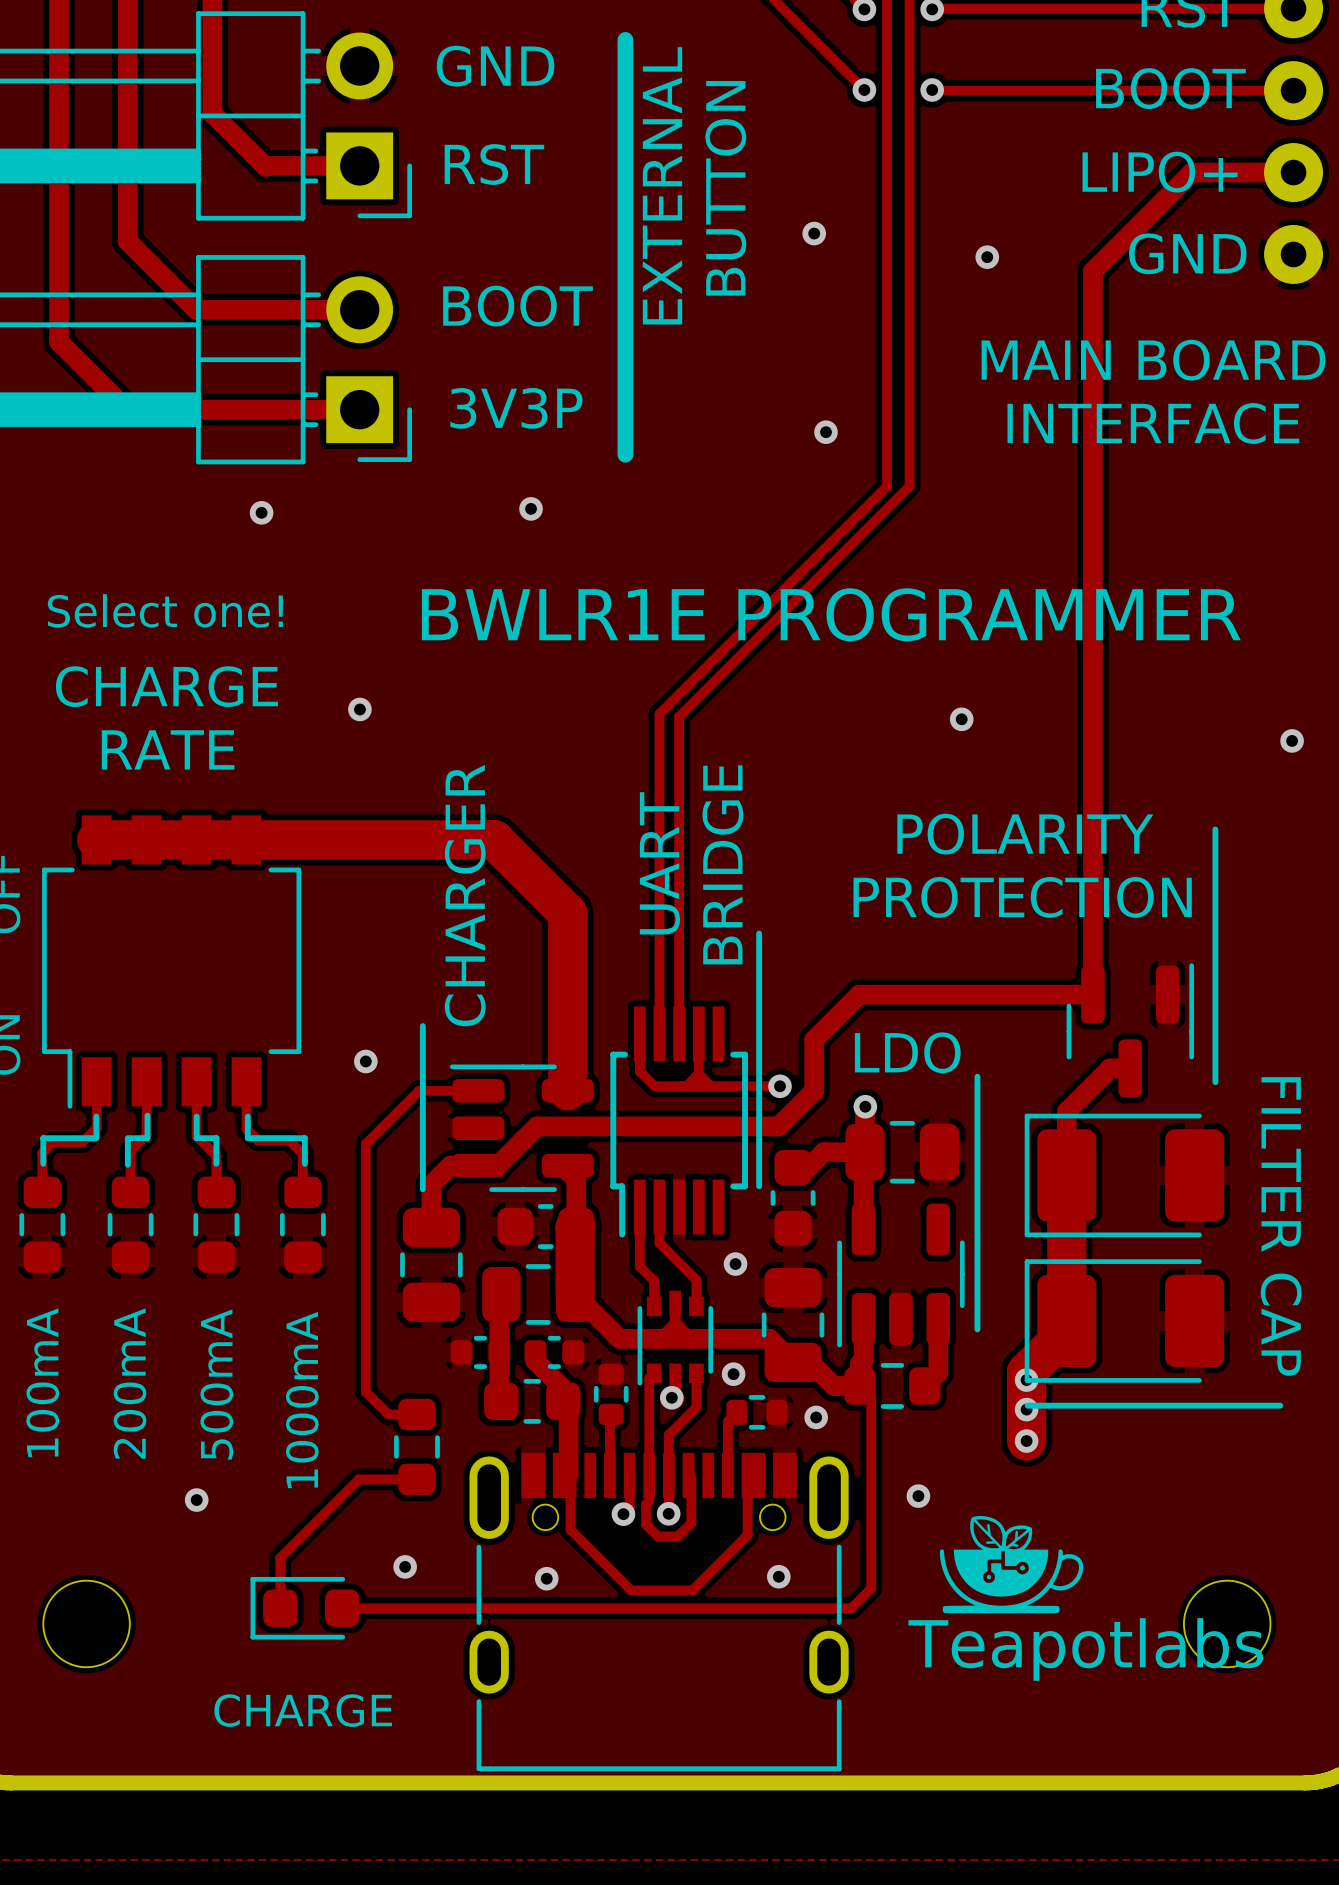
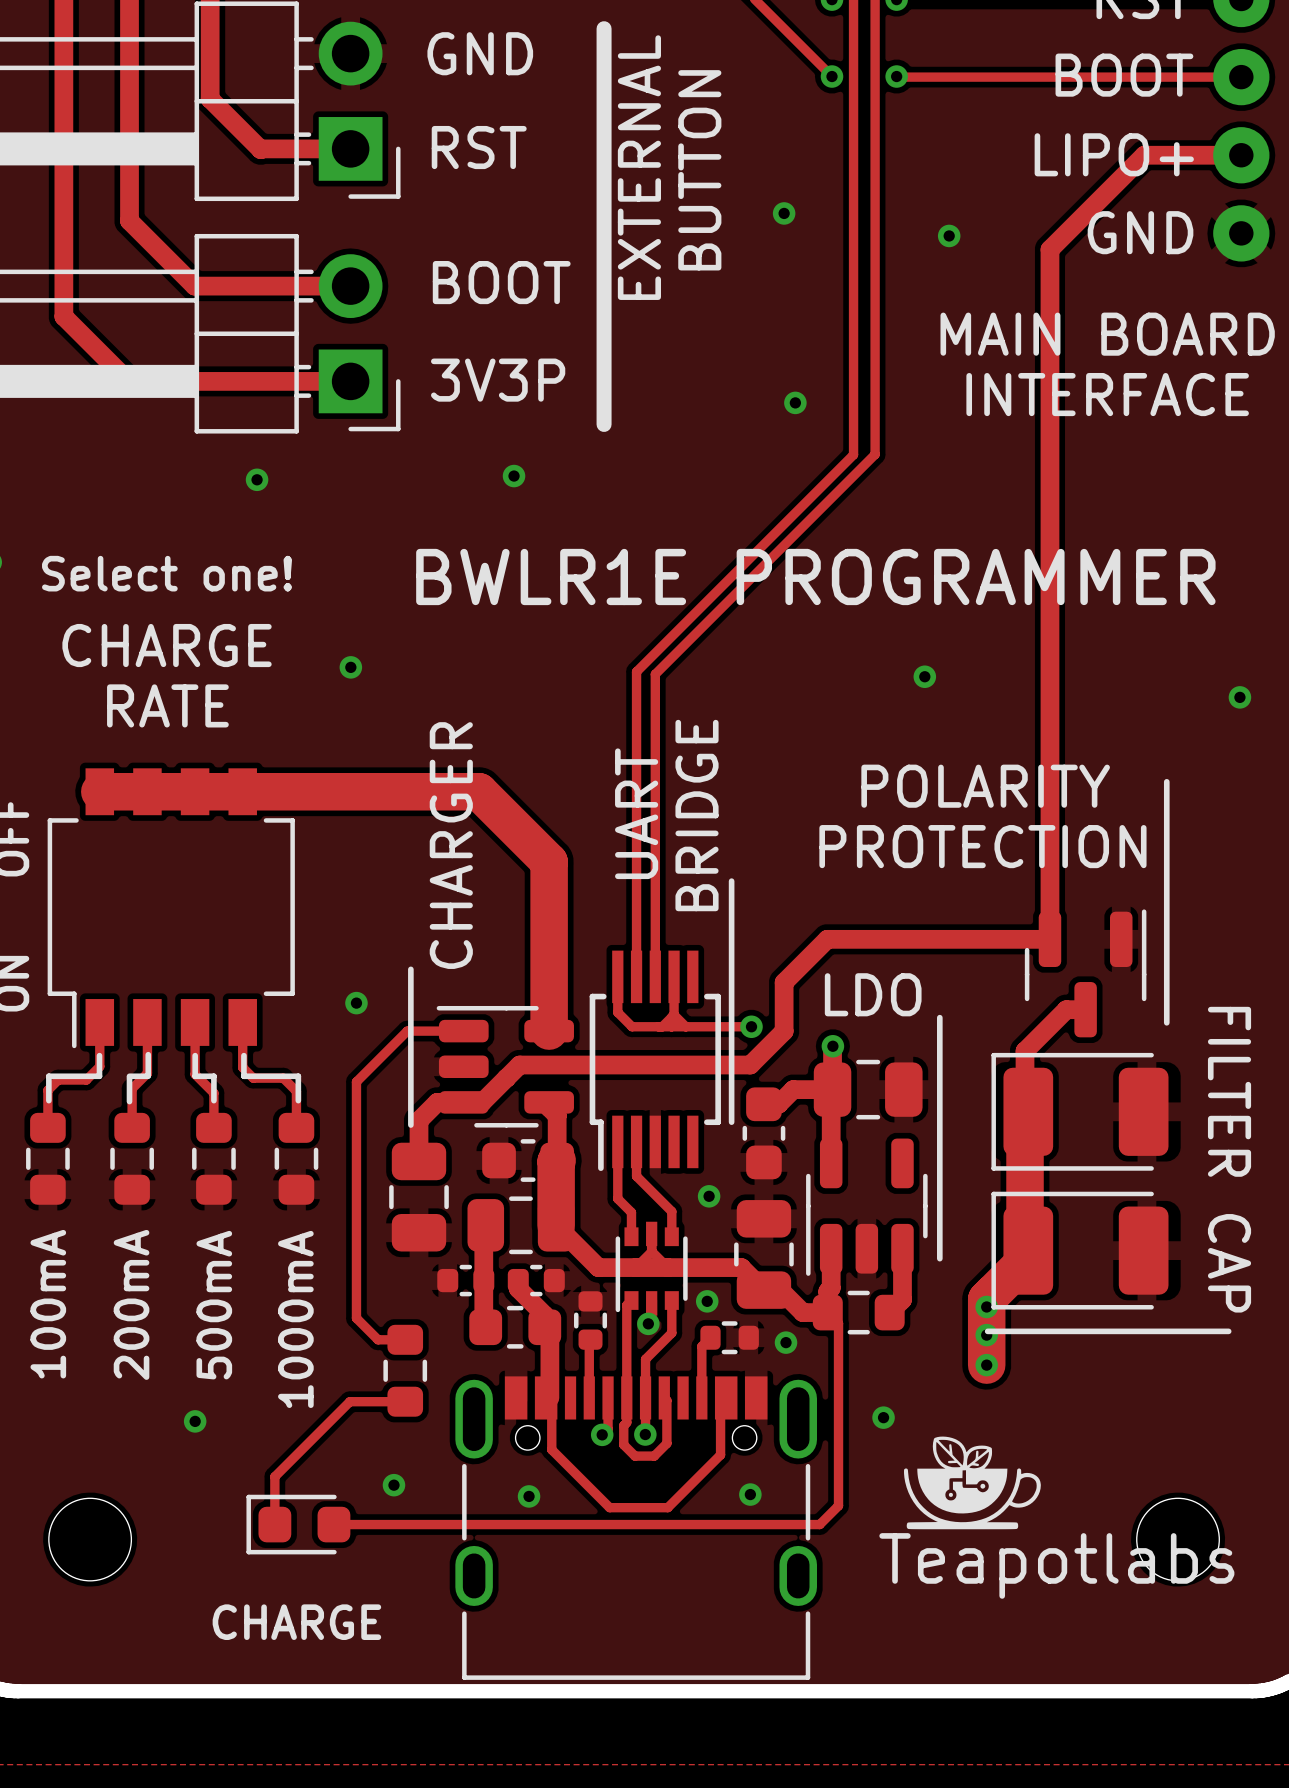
part footprint: [1024, 1113, 1225, 1238] -> [991, 1052, 1169, 1171]
part footprint: [1024, 1259, 1225, 1383] -> [991, 1191, 1169, 1310]

